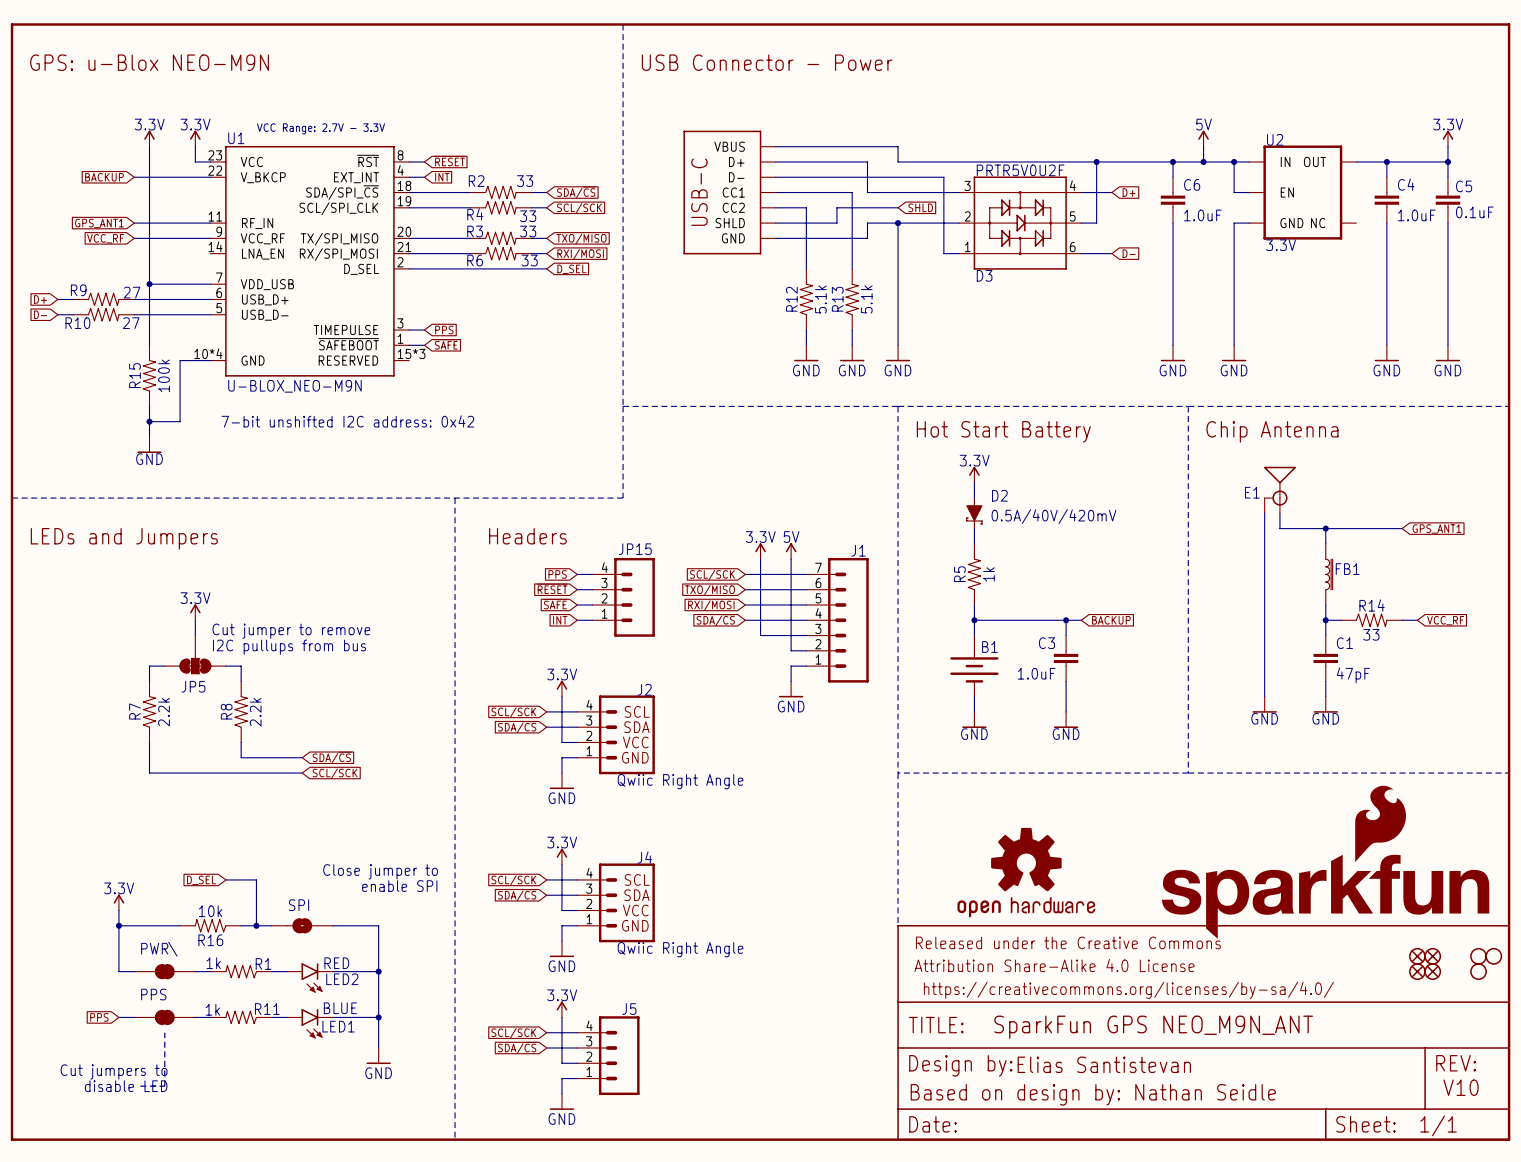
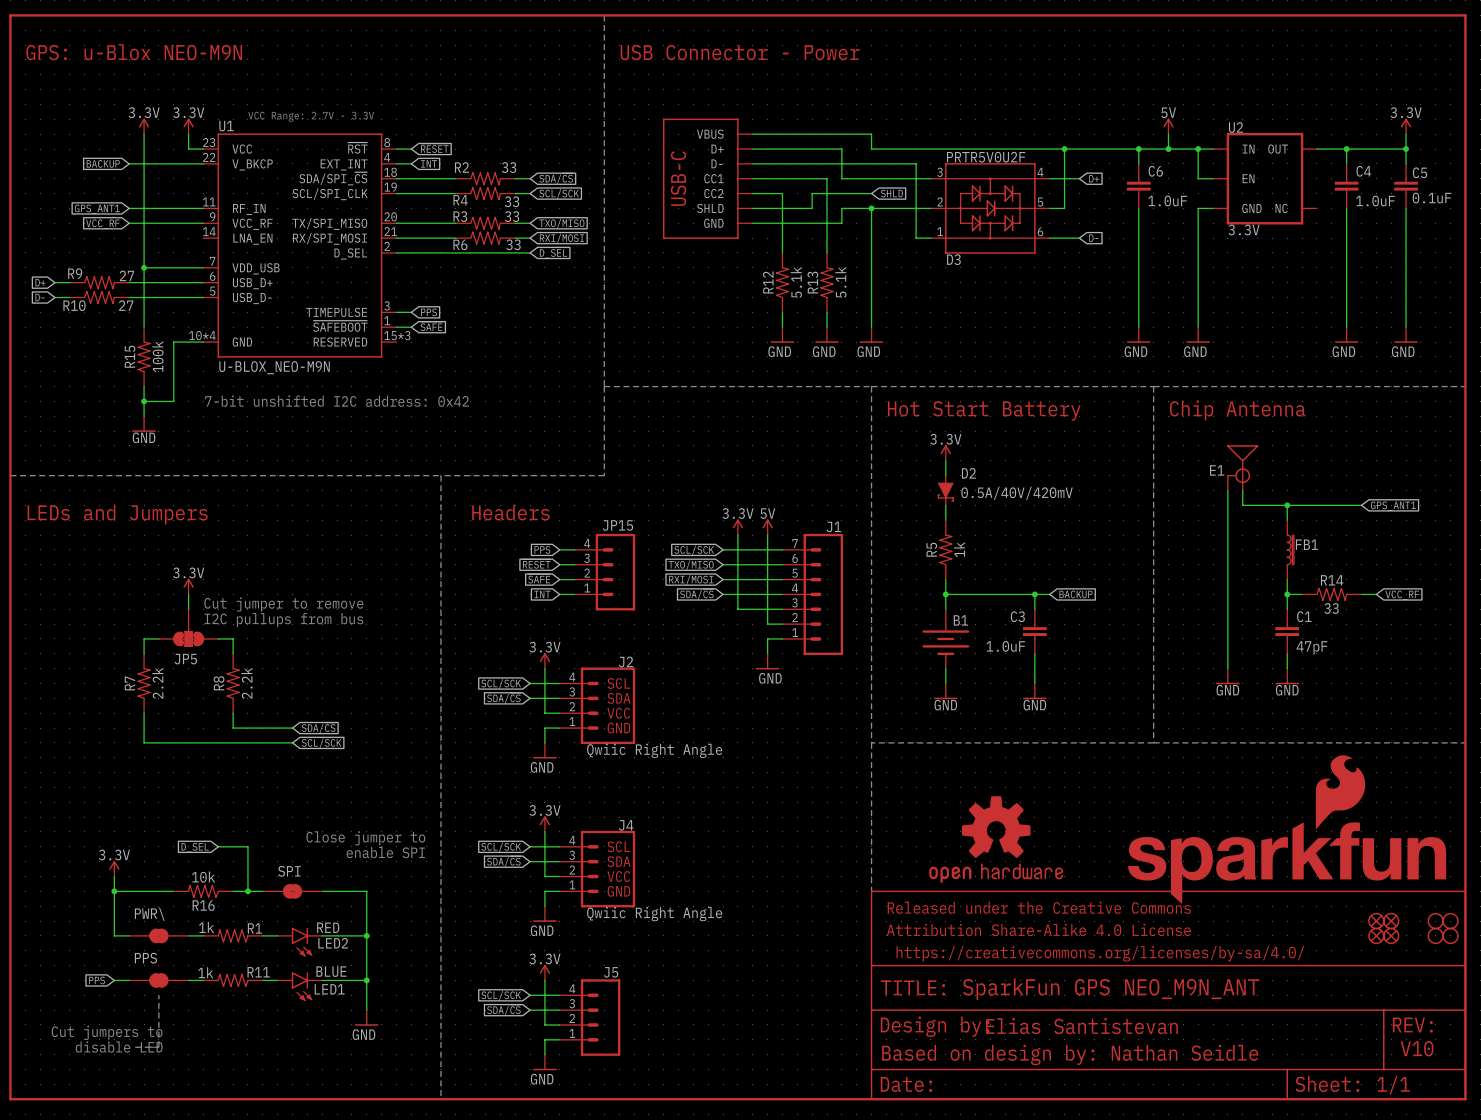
part: none -> (1450, 935)

